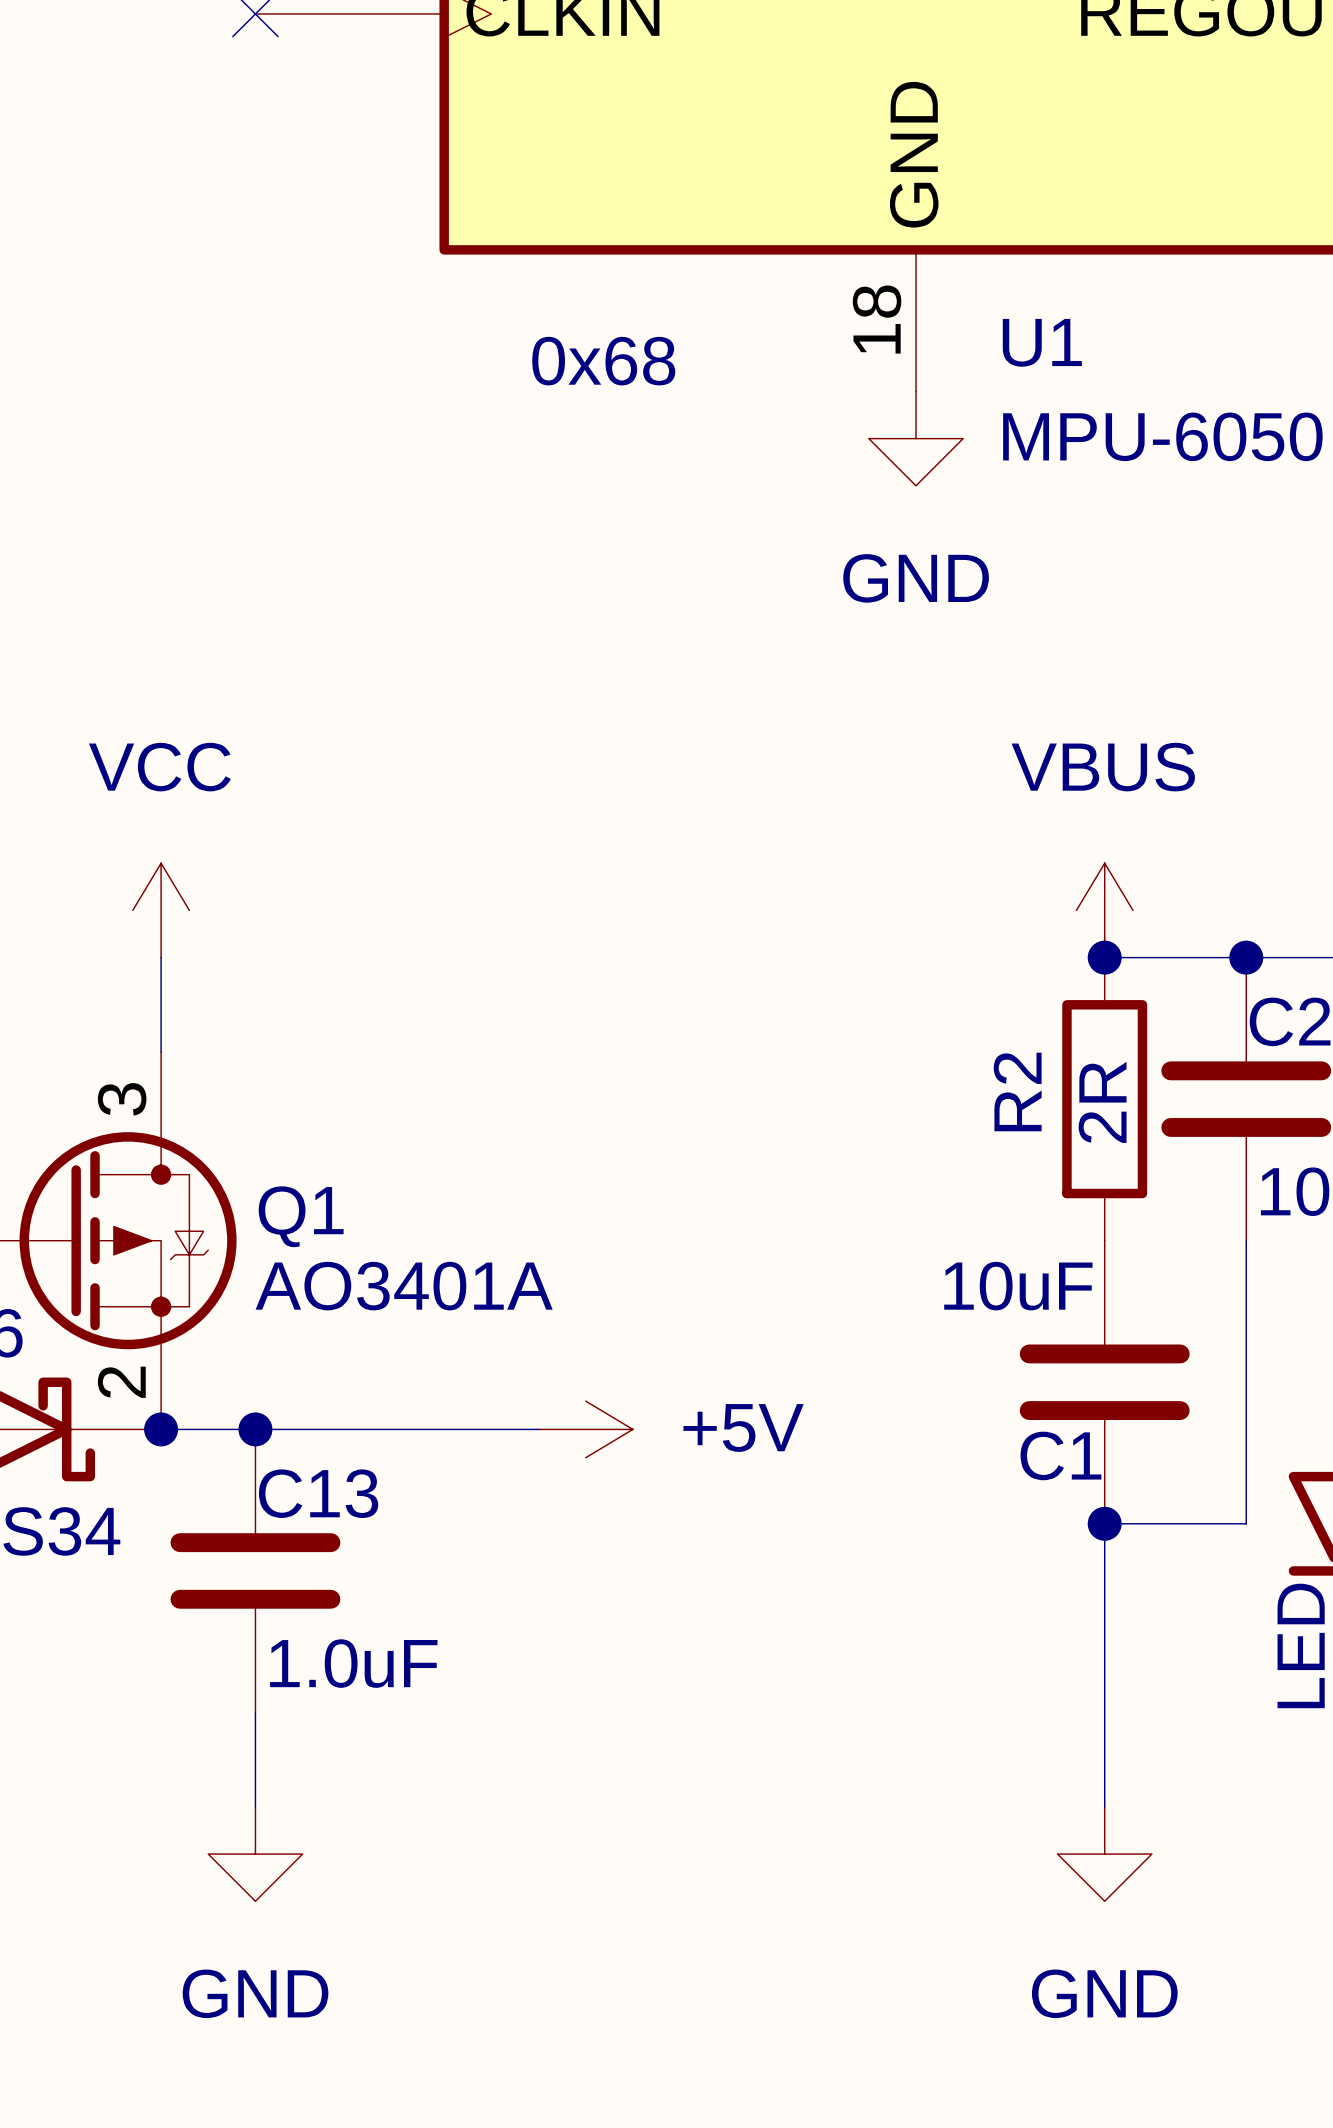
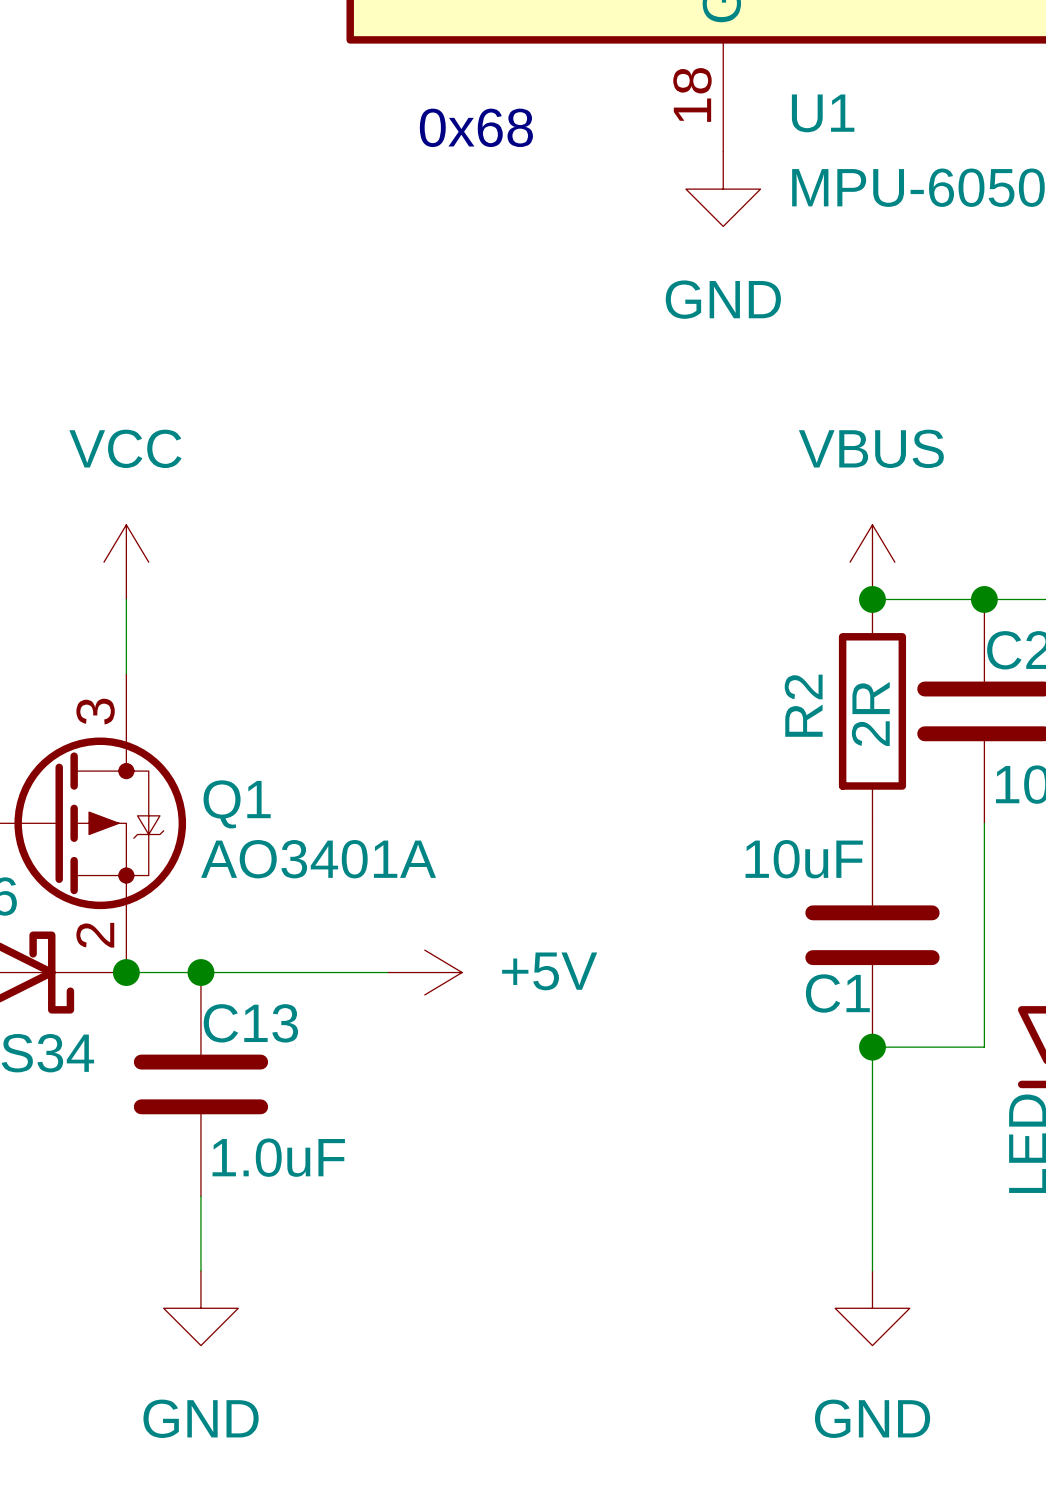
power symbol position: +5V (585, 1429) -> +5V (424, 972)

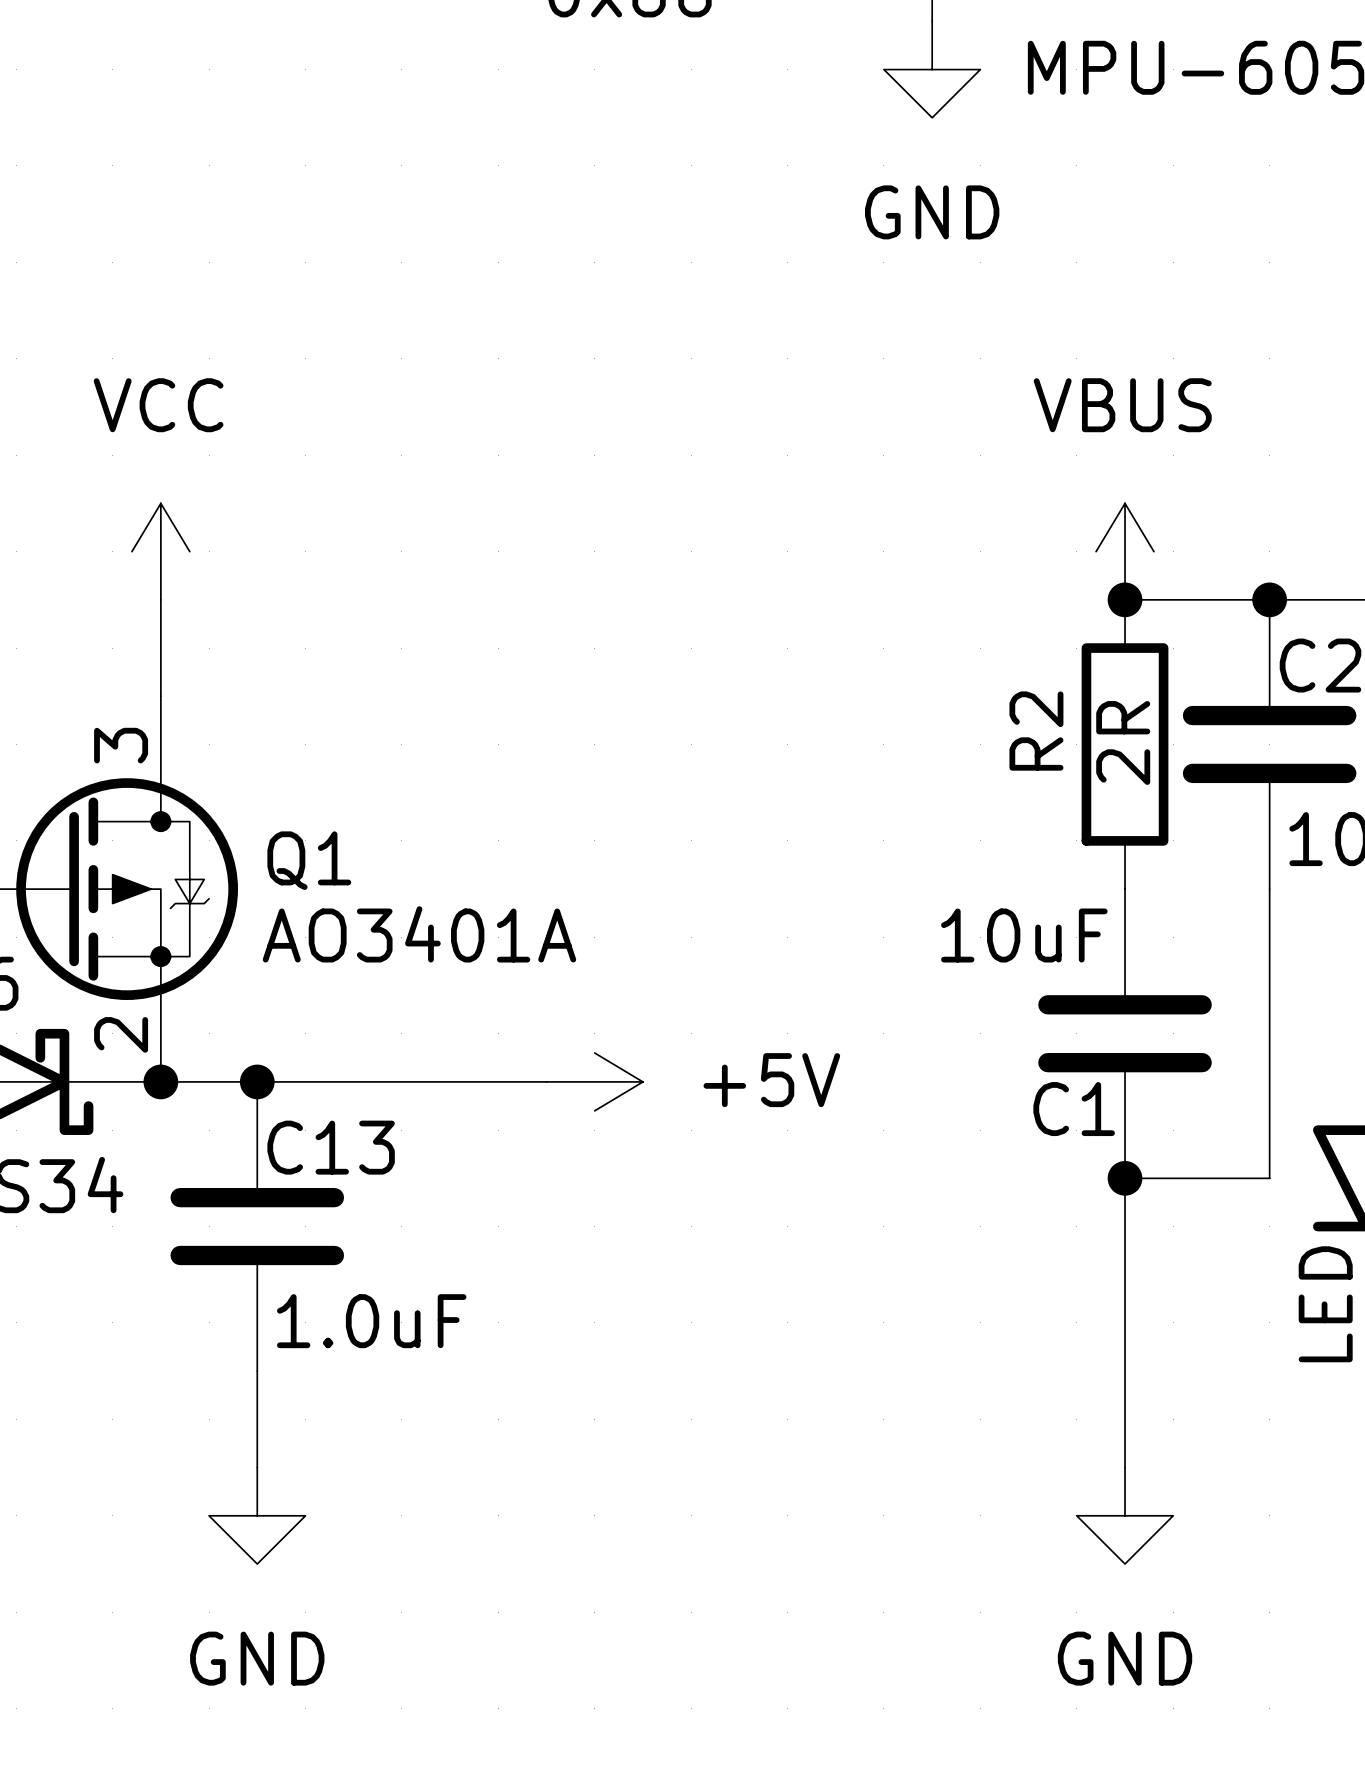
power symbol position: +5V (424, 972) -> +5V (594, 1081)

